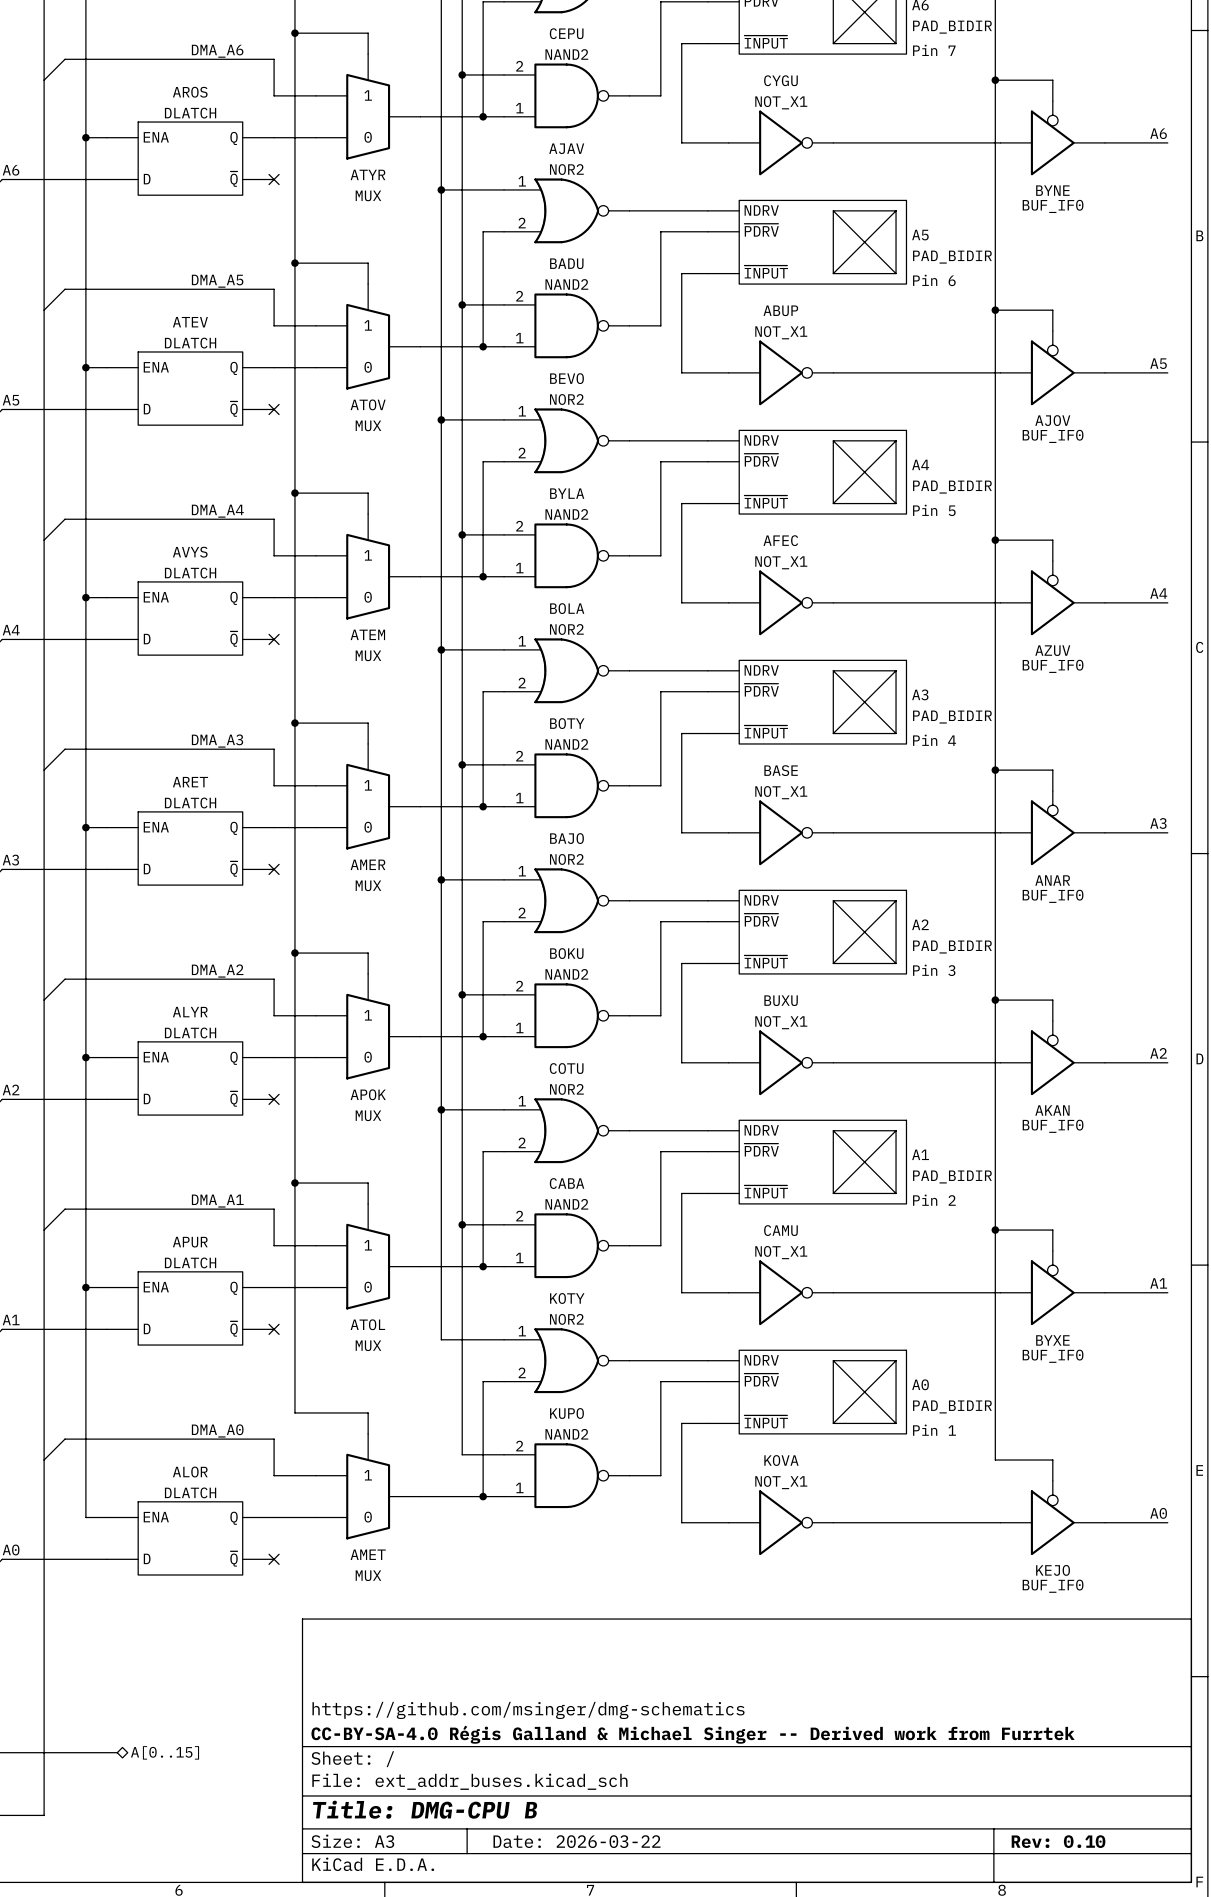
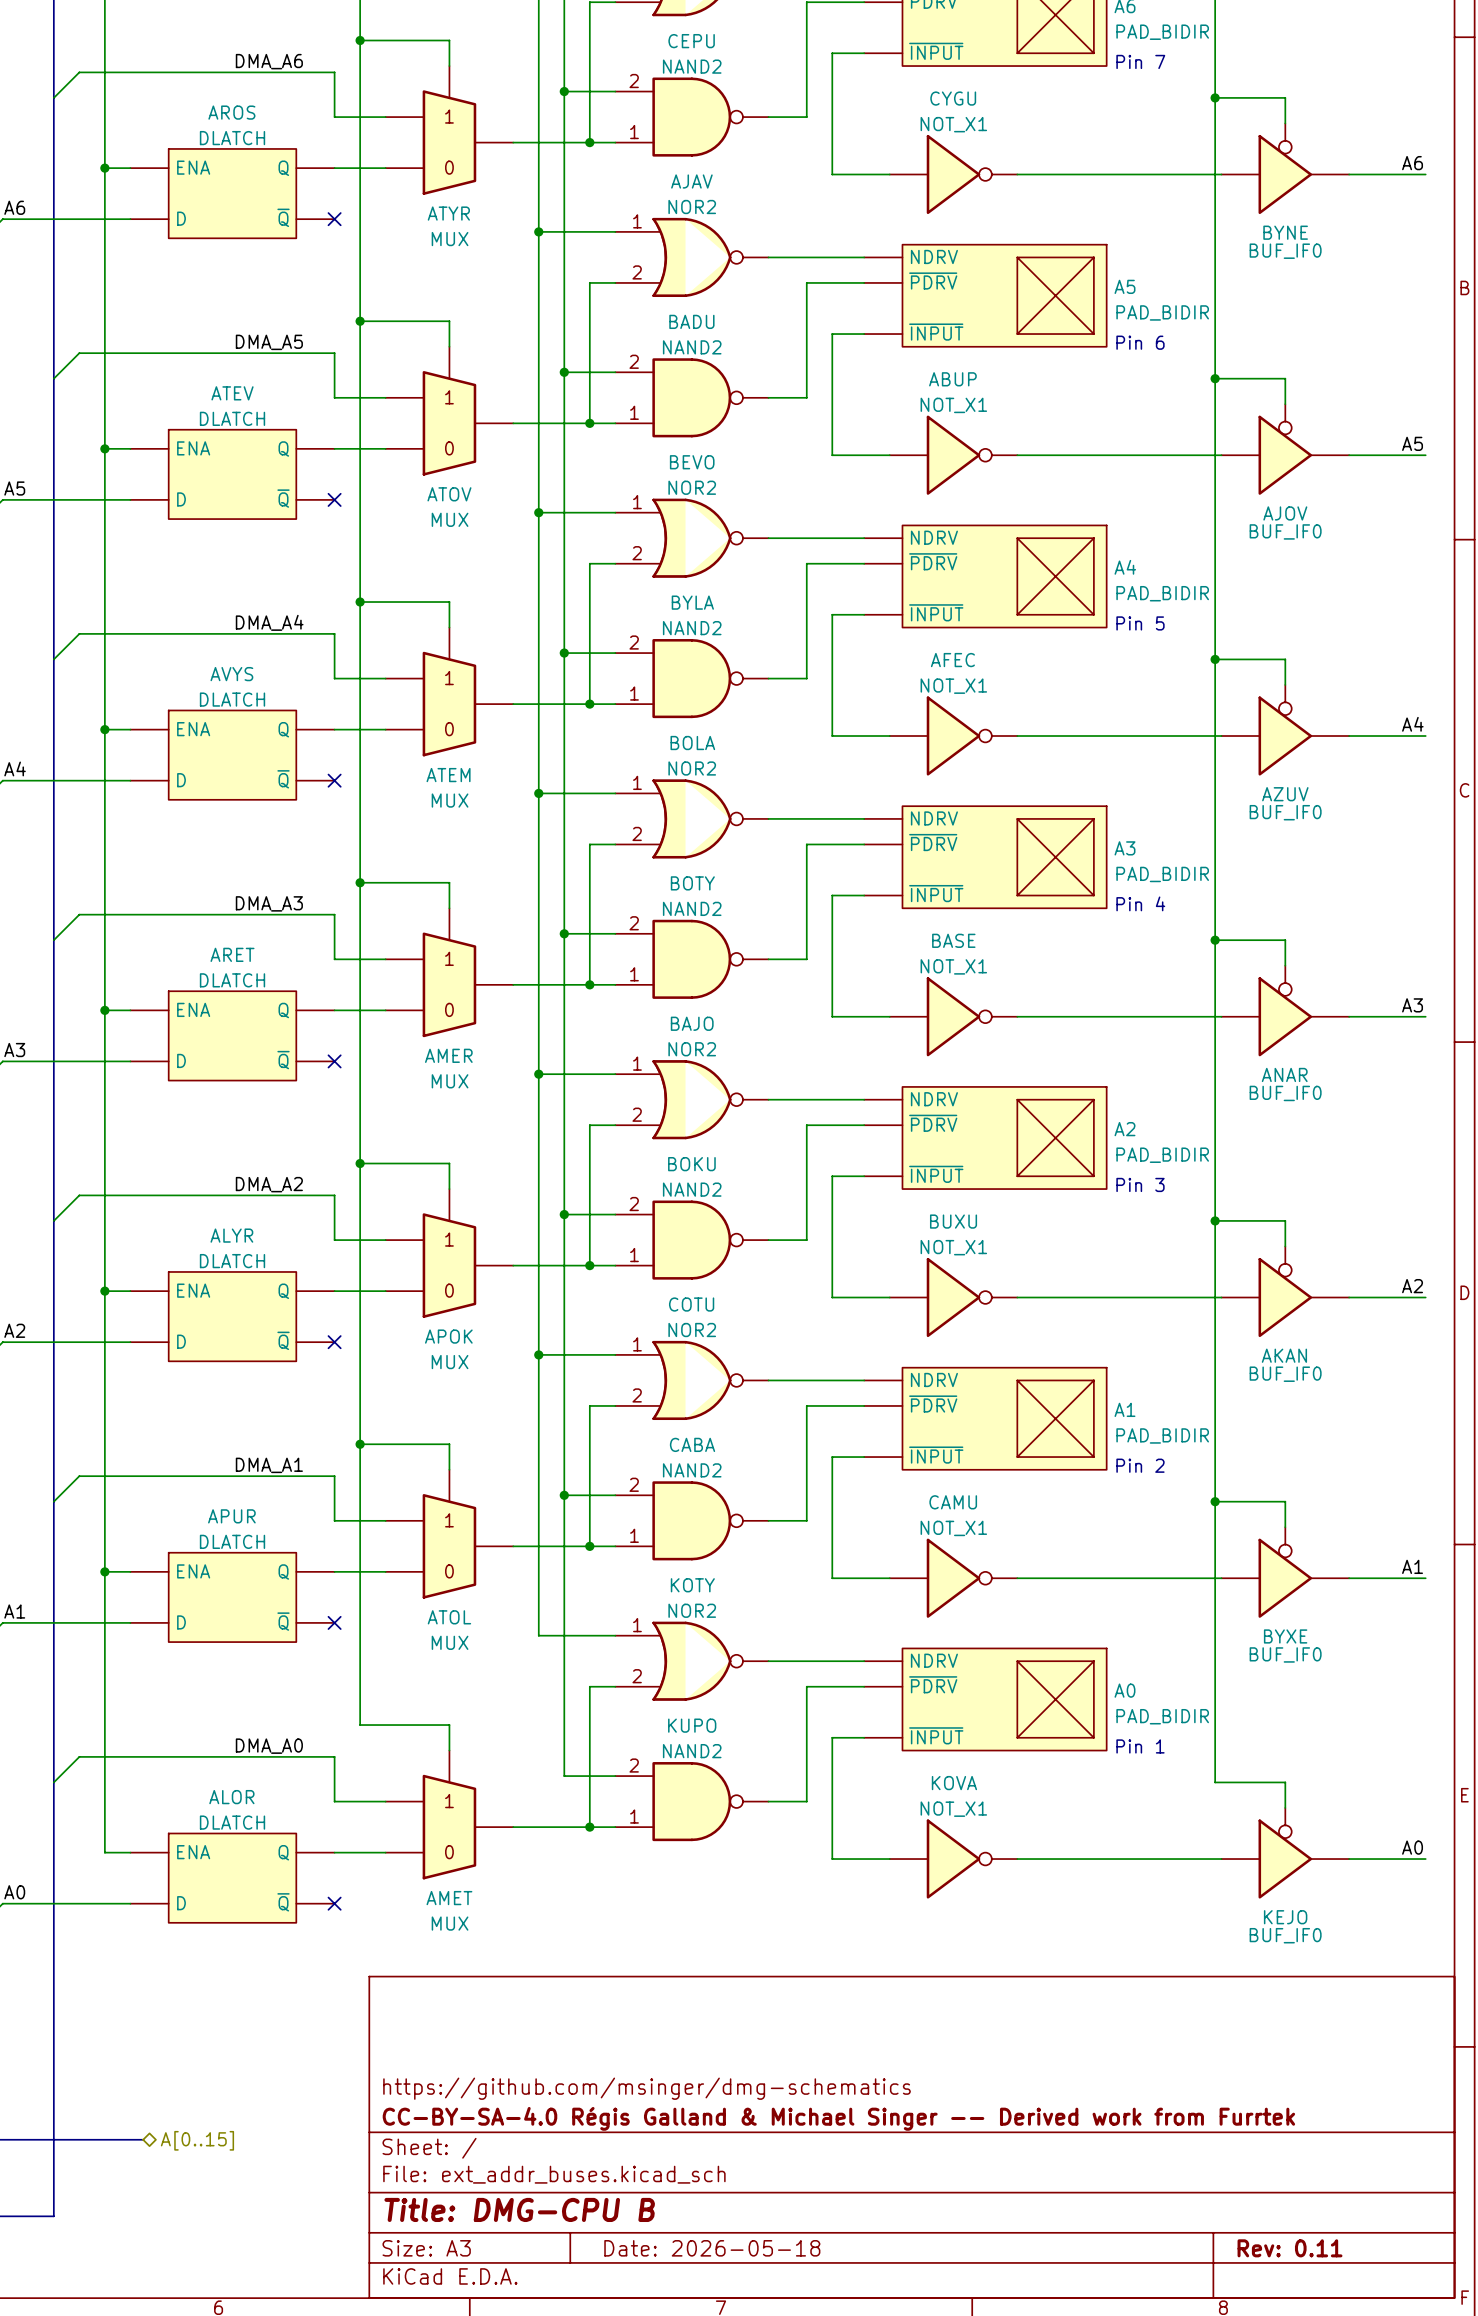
title block: Date: 2026-03-22 (577, 1841) -> Date: 2026-05-18 (712, 2248)
title block: Rev: 0.10 (1058, 1841) -> Rev: 0.11 (1290, 2248)

